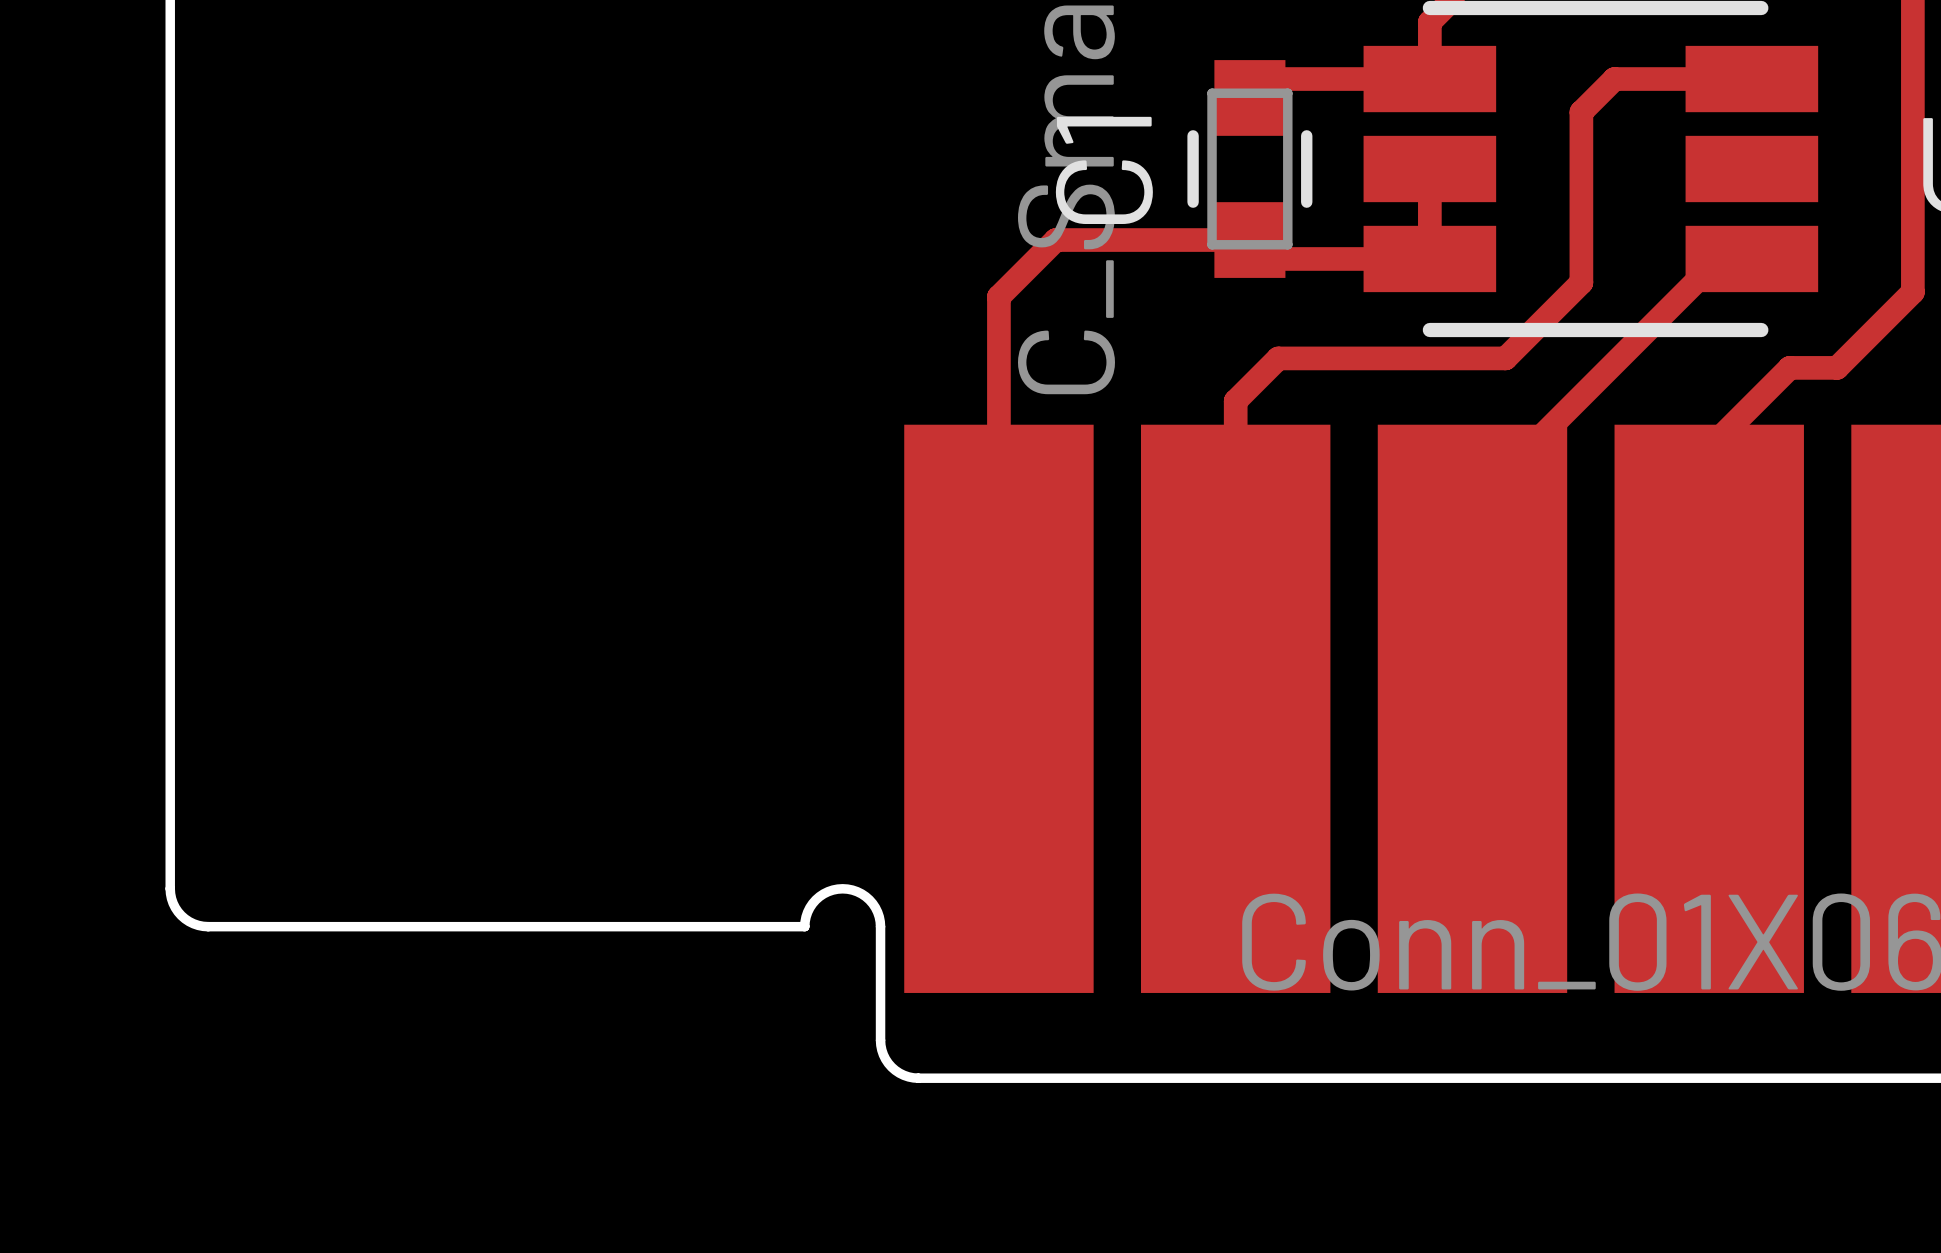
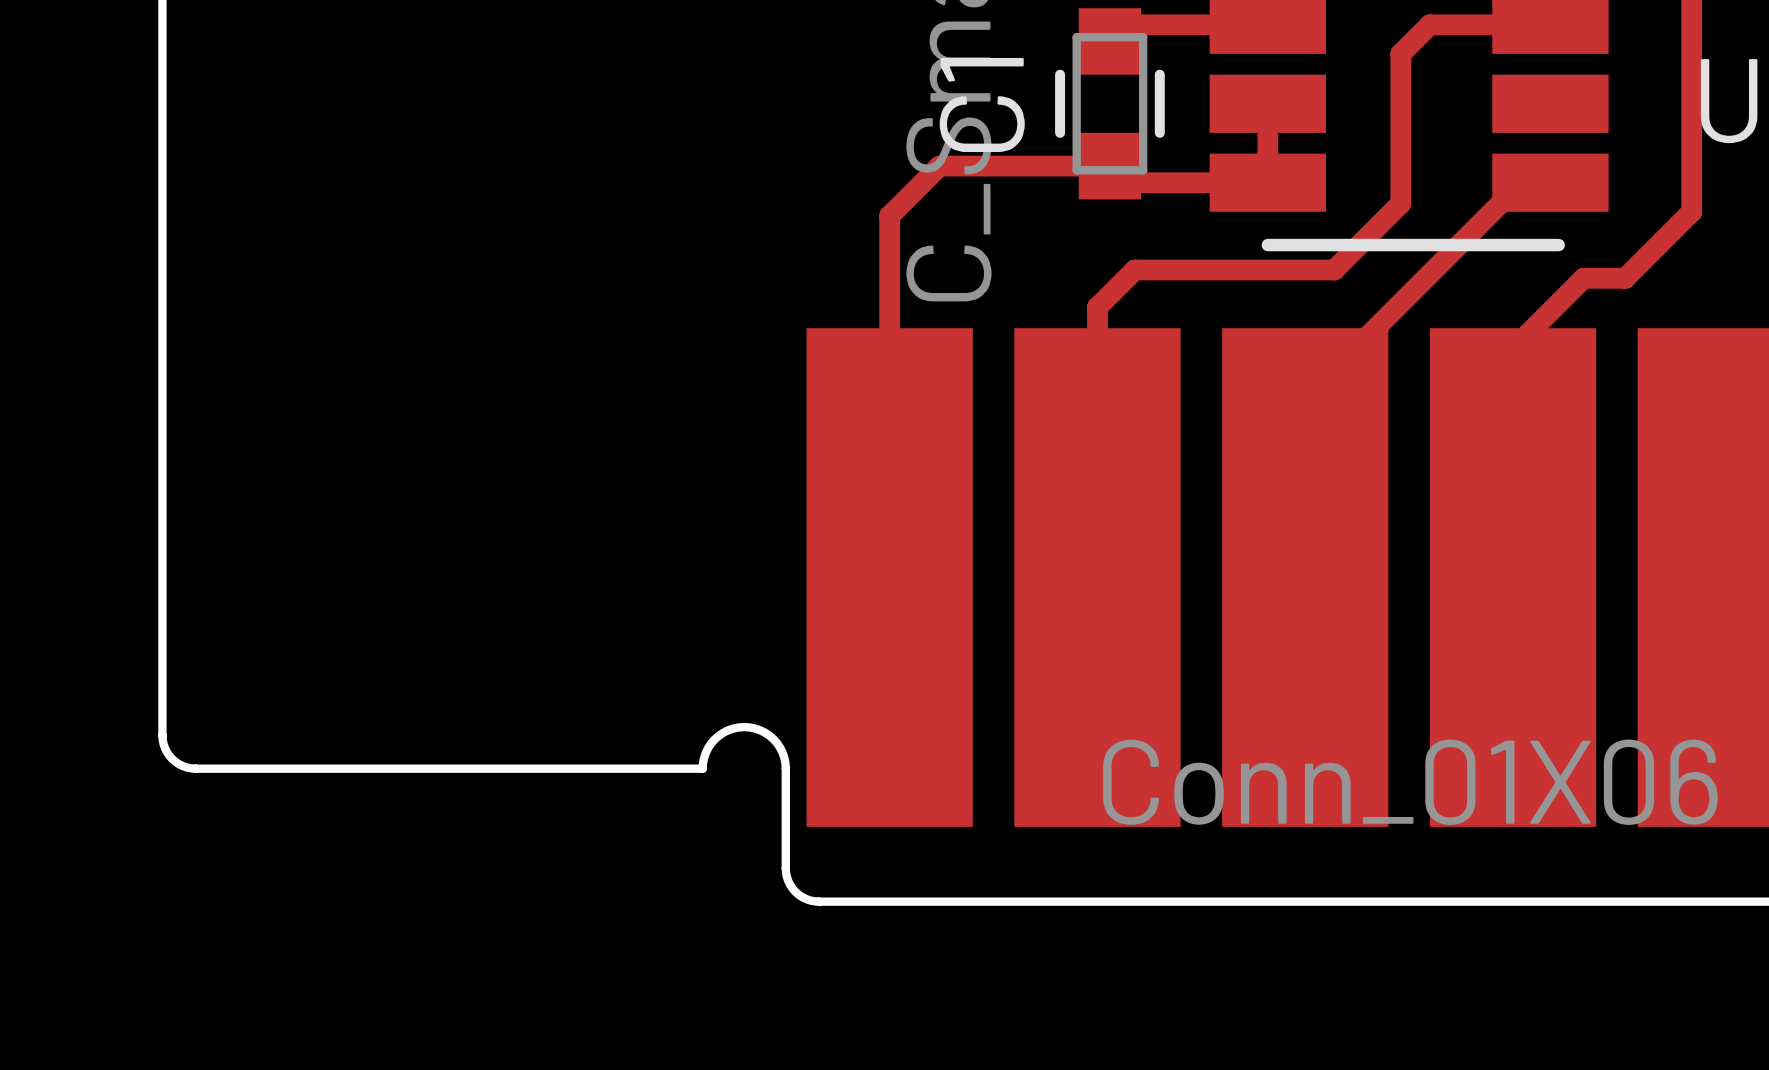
board edge: (785, 926) (804, 926) (807, 912) (815, 899) (828, 891) (842, 888) (857, 891) (869, 899) (877, 912) (880, 926) -> (702, 768) (705, 752) (714, 739) (728, 730) (744, 727) (760, 730) (773, 739) (782, 752) (785, 768)

